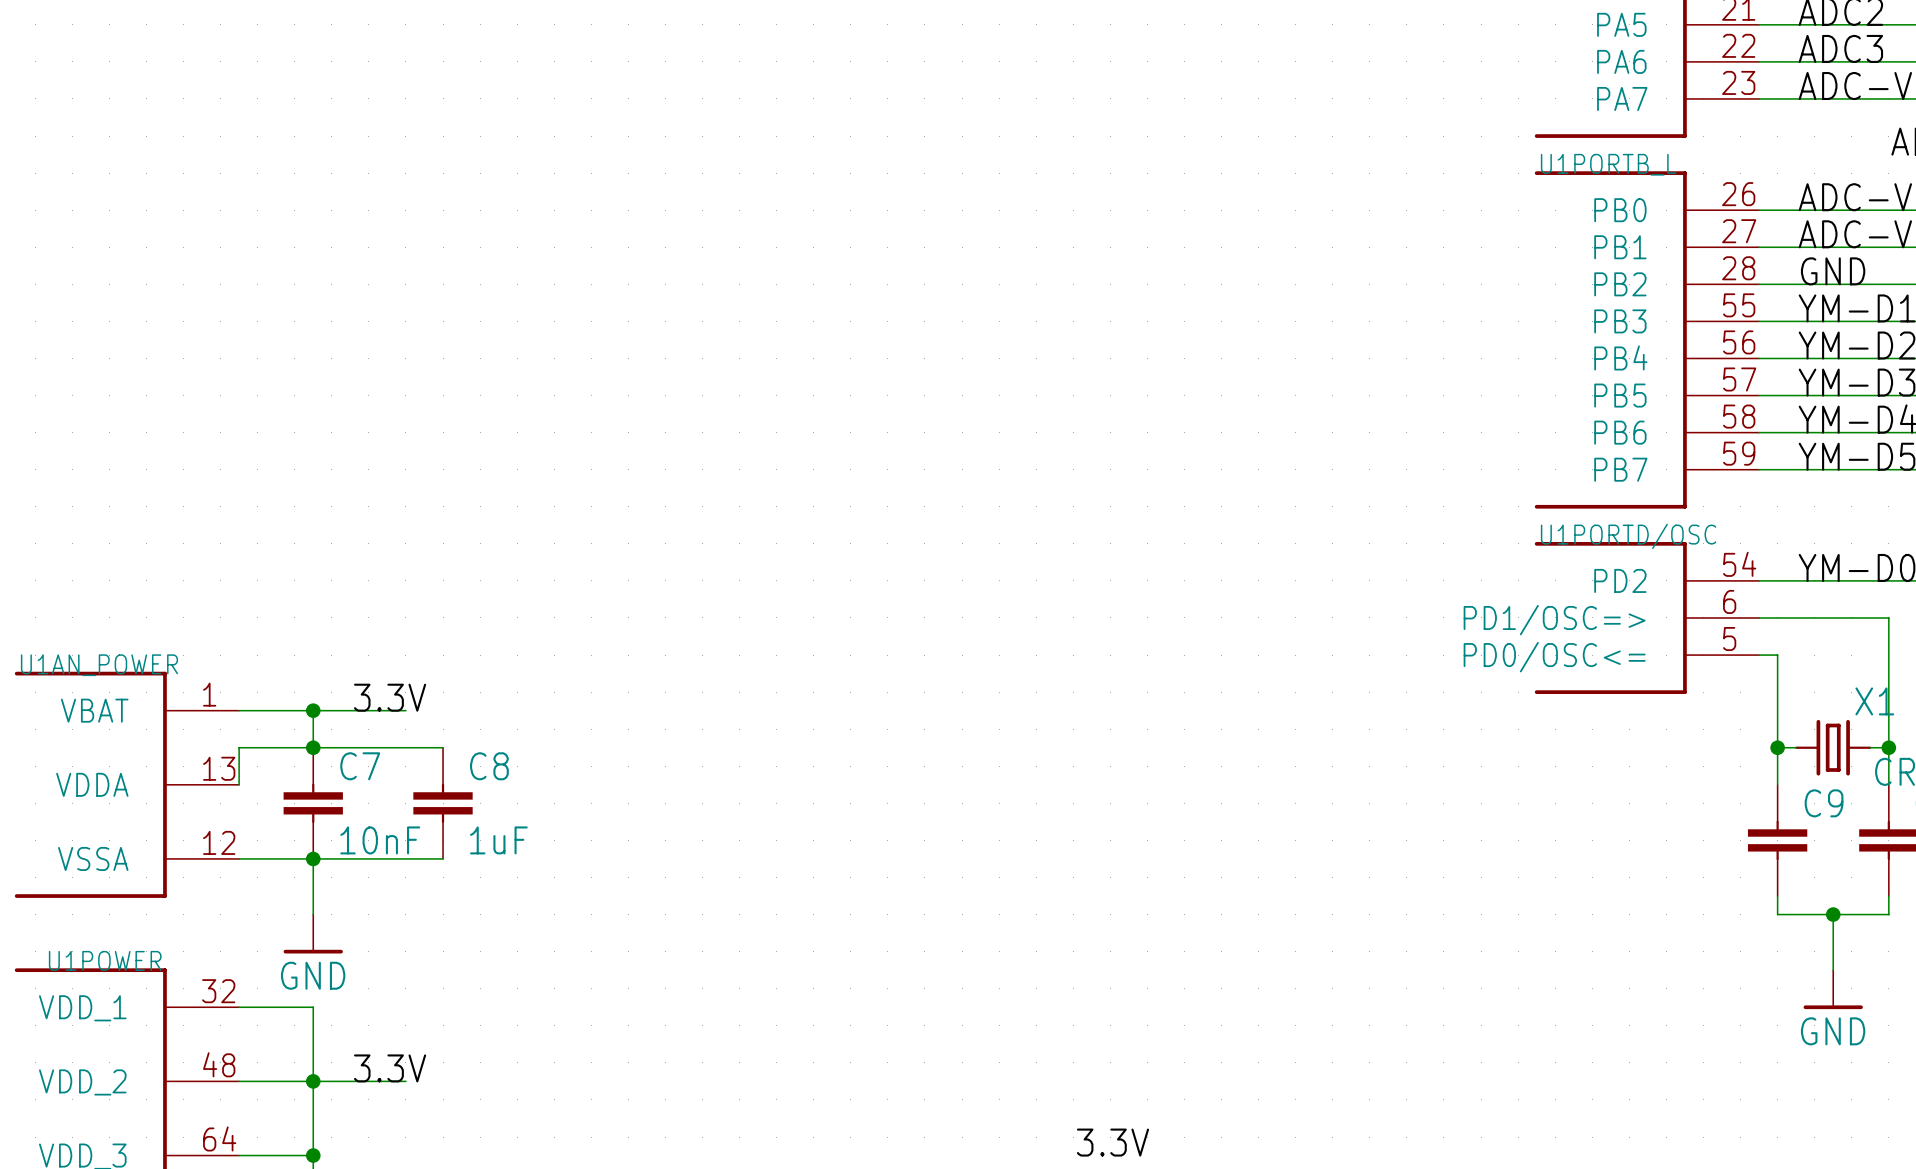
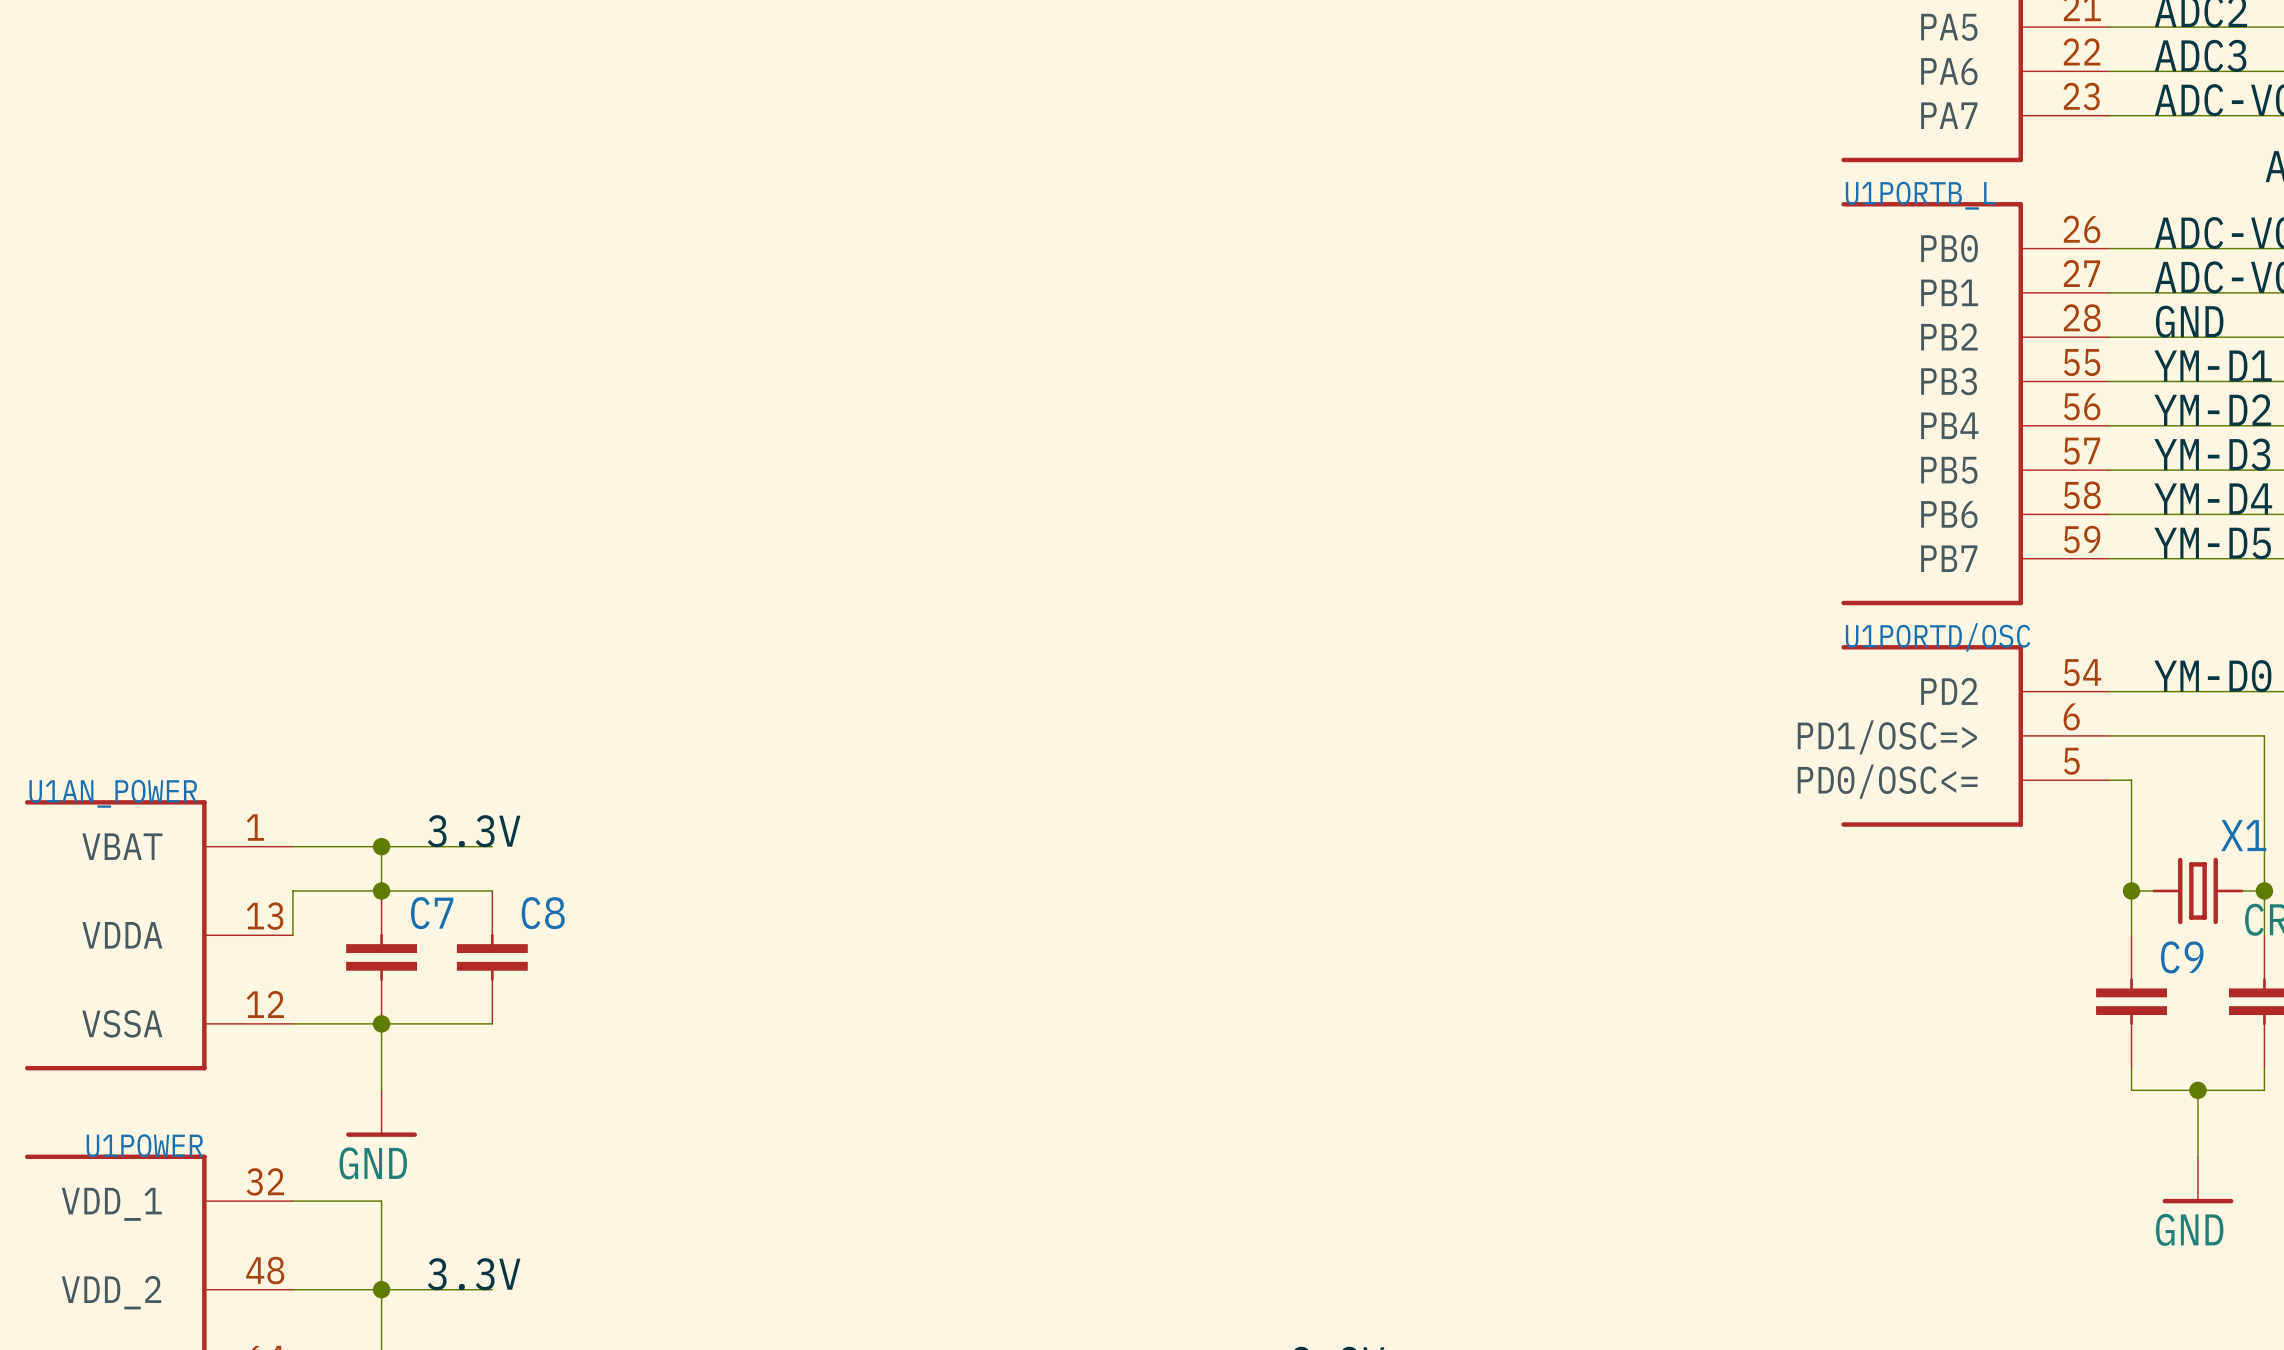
wire: (405, 747) (443, 747) -> none
C8 position: (443, 803) -> (492, 957)
C7 value: 10nF (380, 840) -> none
C8 value: 1uF (498, 840) -> none
wire: (405, 858) (443, 858) -> none

